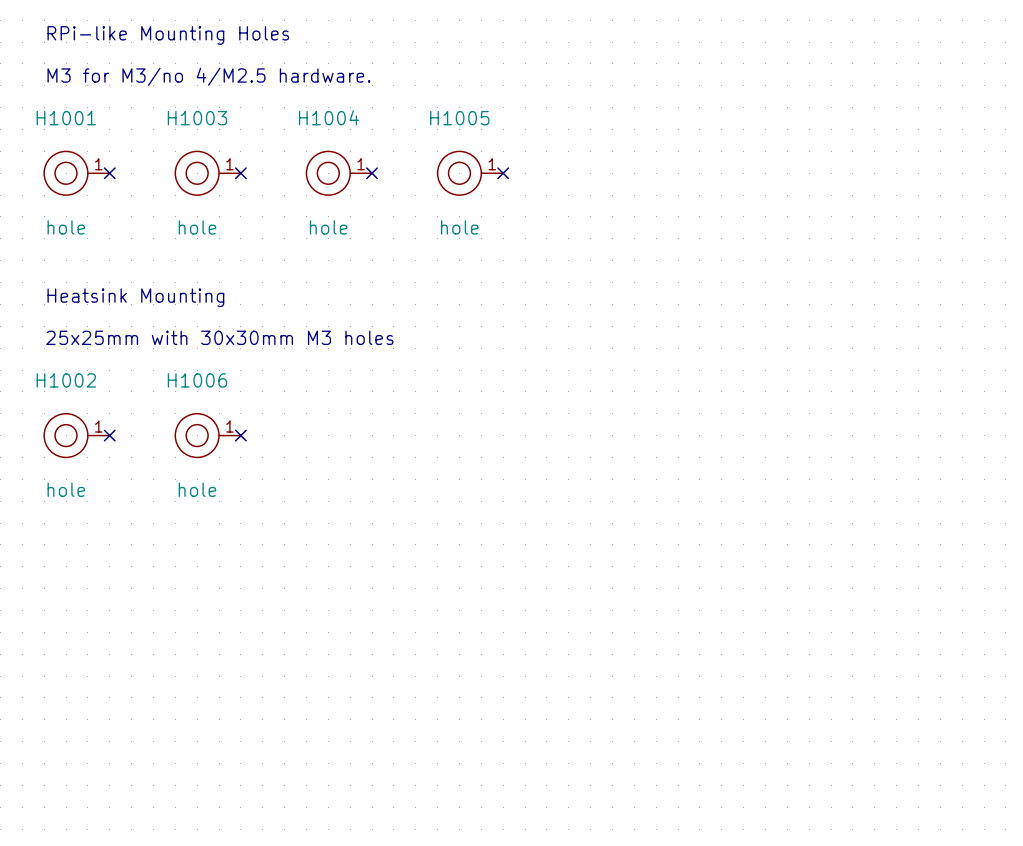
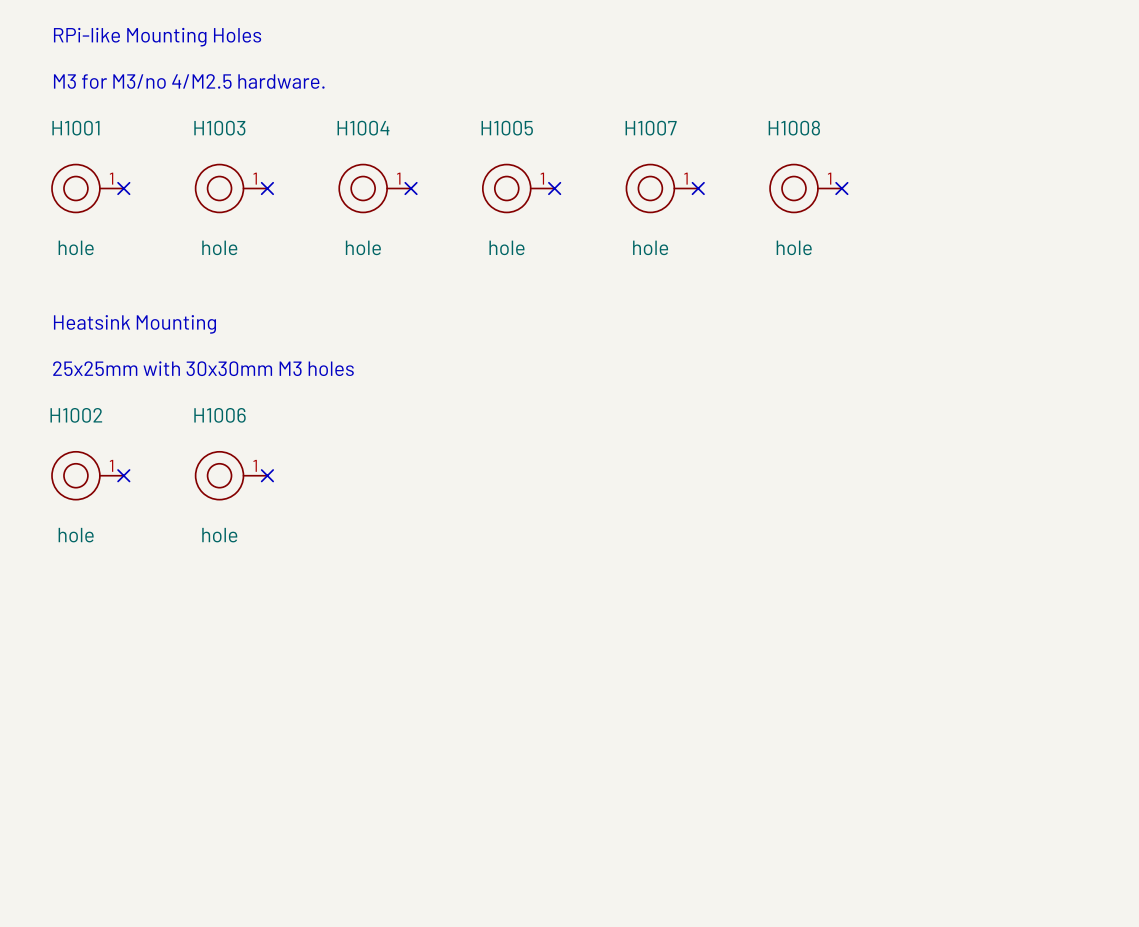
H1007: none -> hole (662, 188)
no-connect mark: none -> (698, 188)
H1008: none -> hole (805, 188)
no-connect mark: none -> (841, 188)

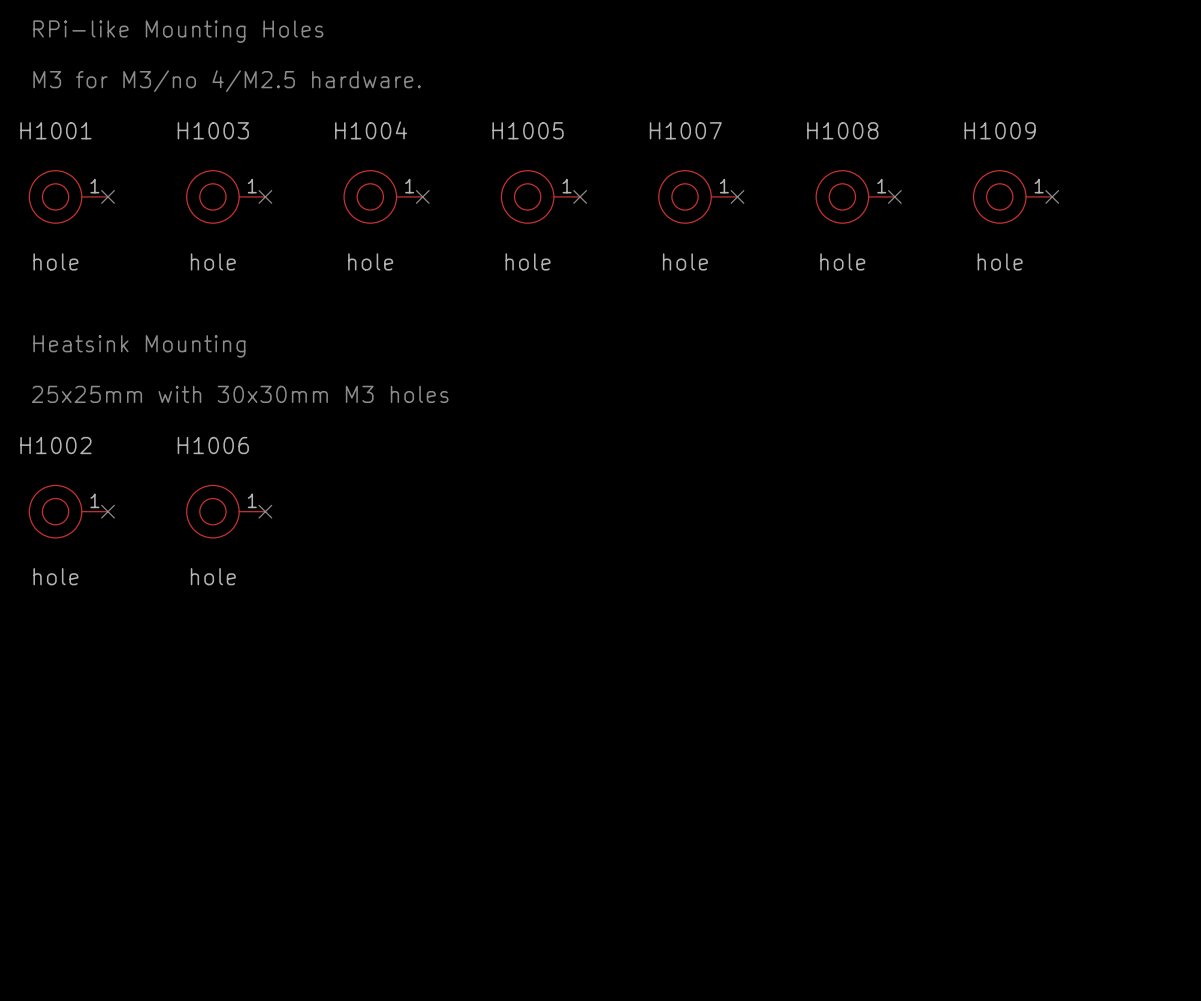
H1009: none -> hole (1012, 196)
no-connect mark: none -> (1052, 196)

